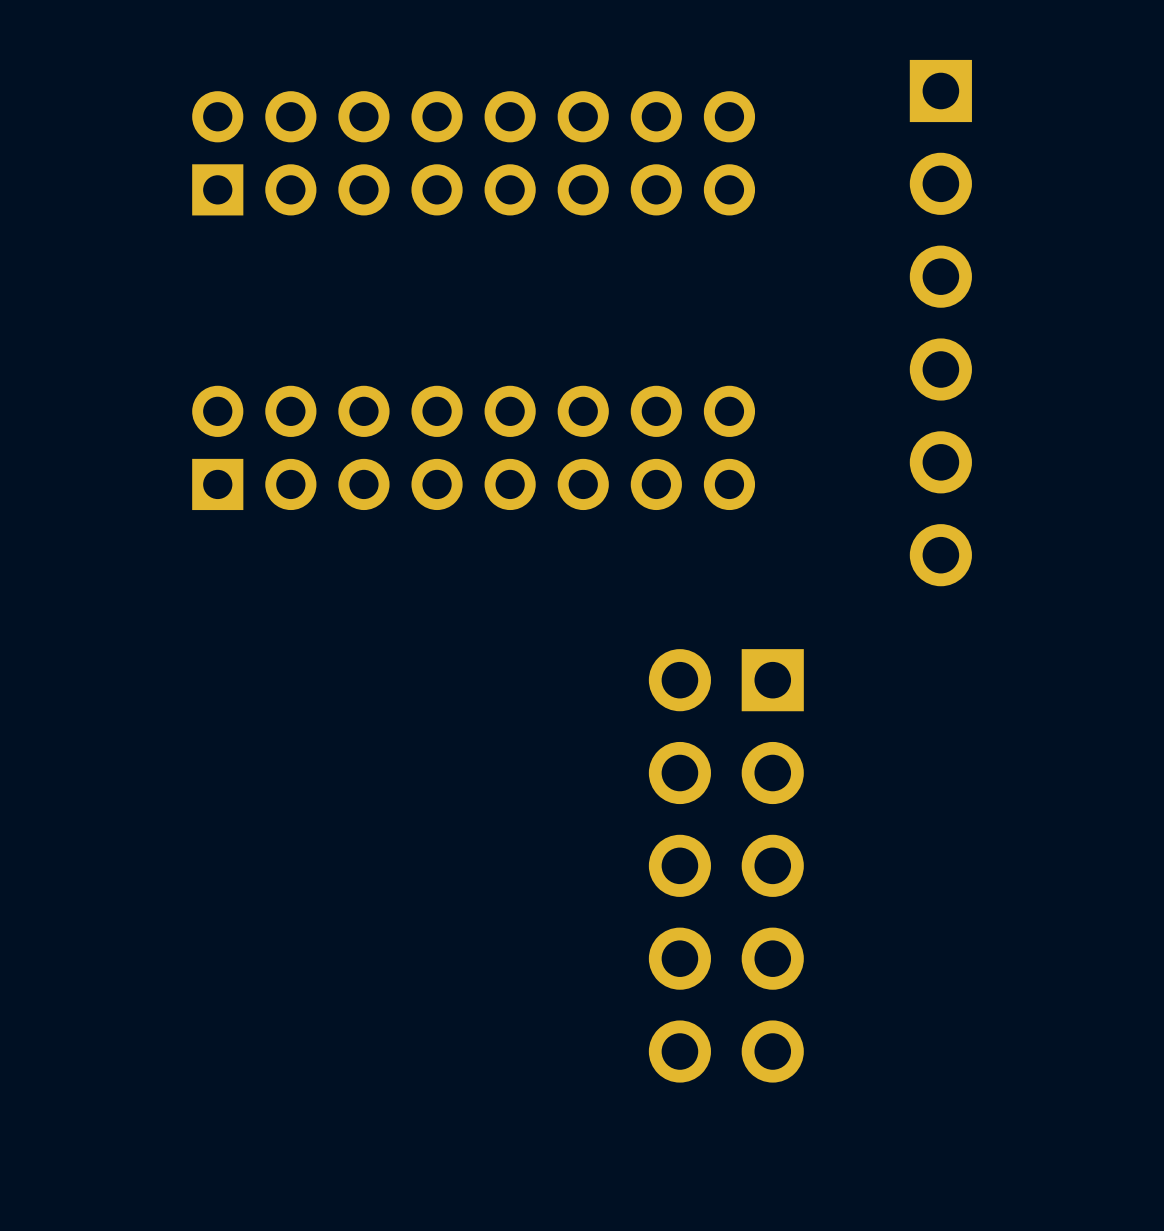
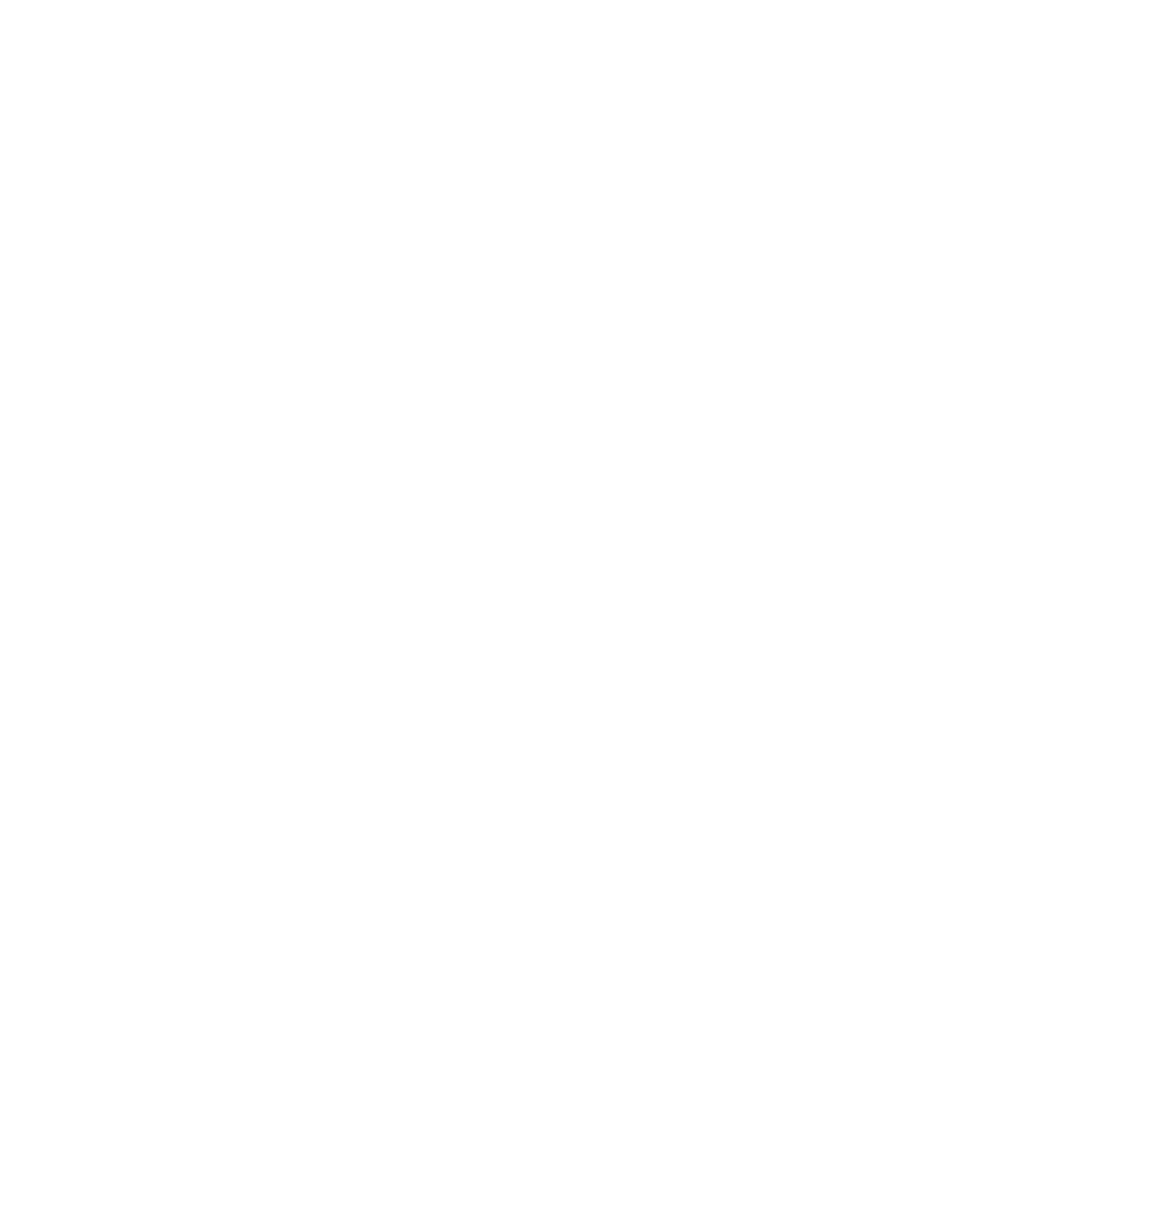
part: (473, 153) -> none
part: (940, 323) -> none
part: (473, 447) -> none
part: (726, 865) -> none

